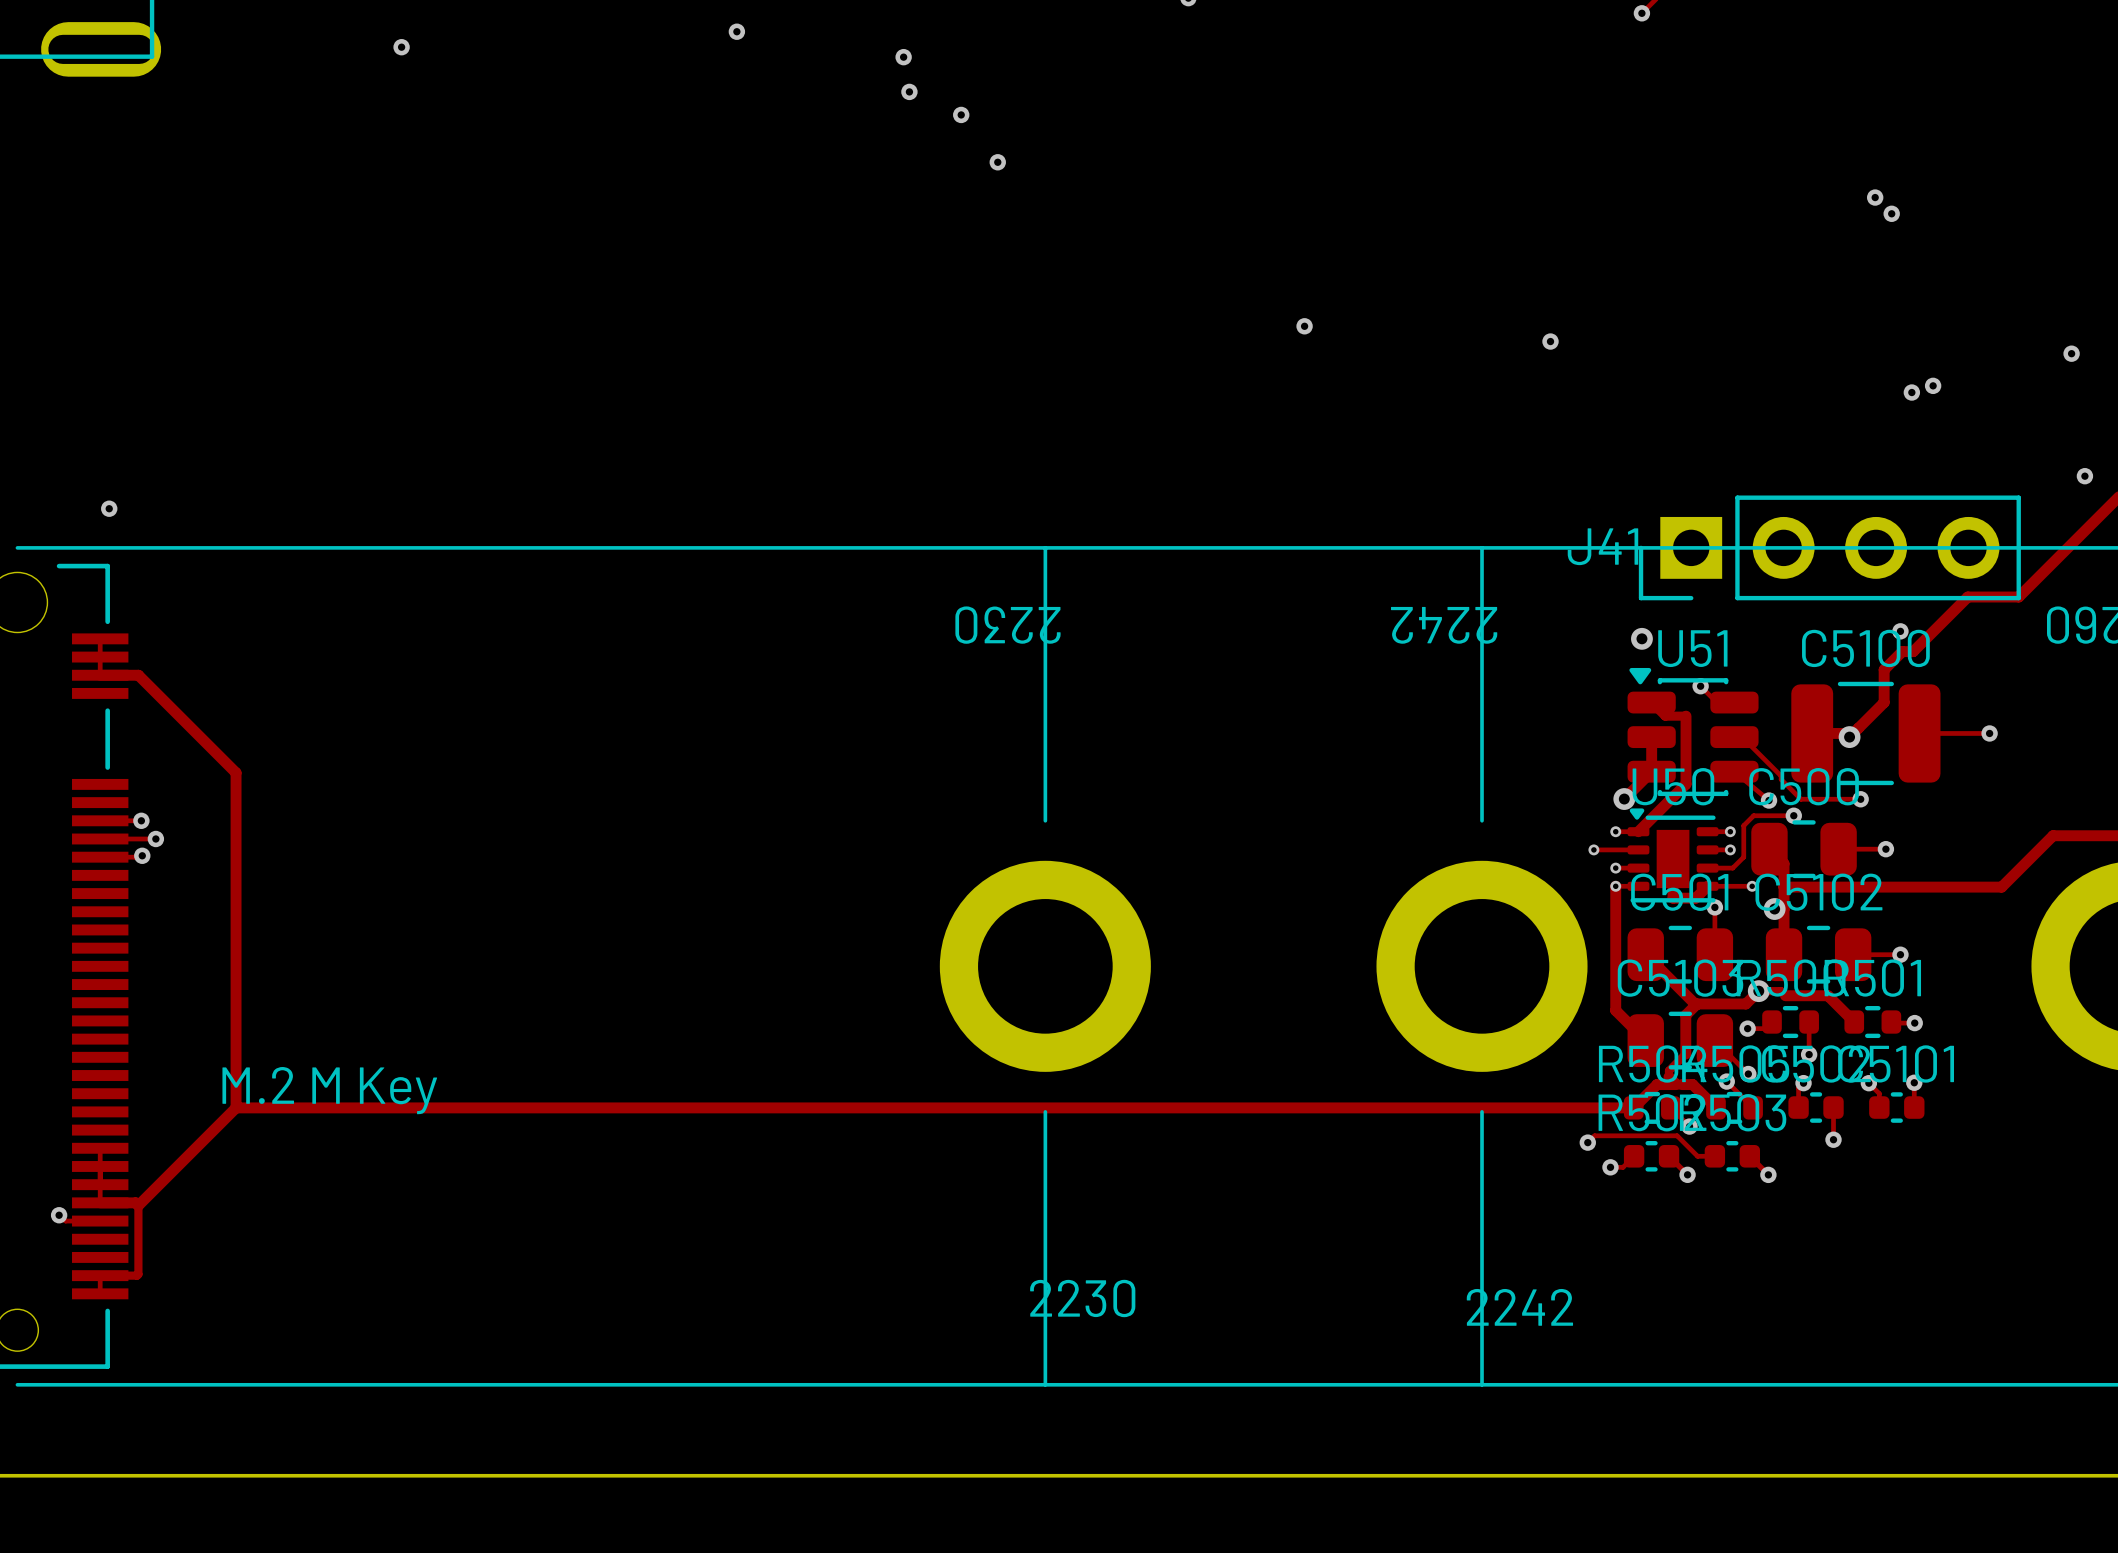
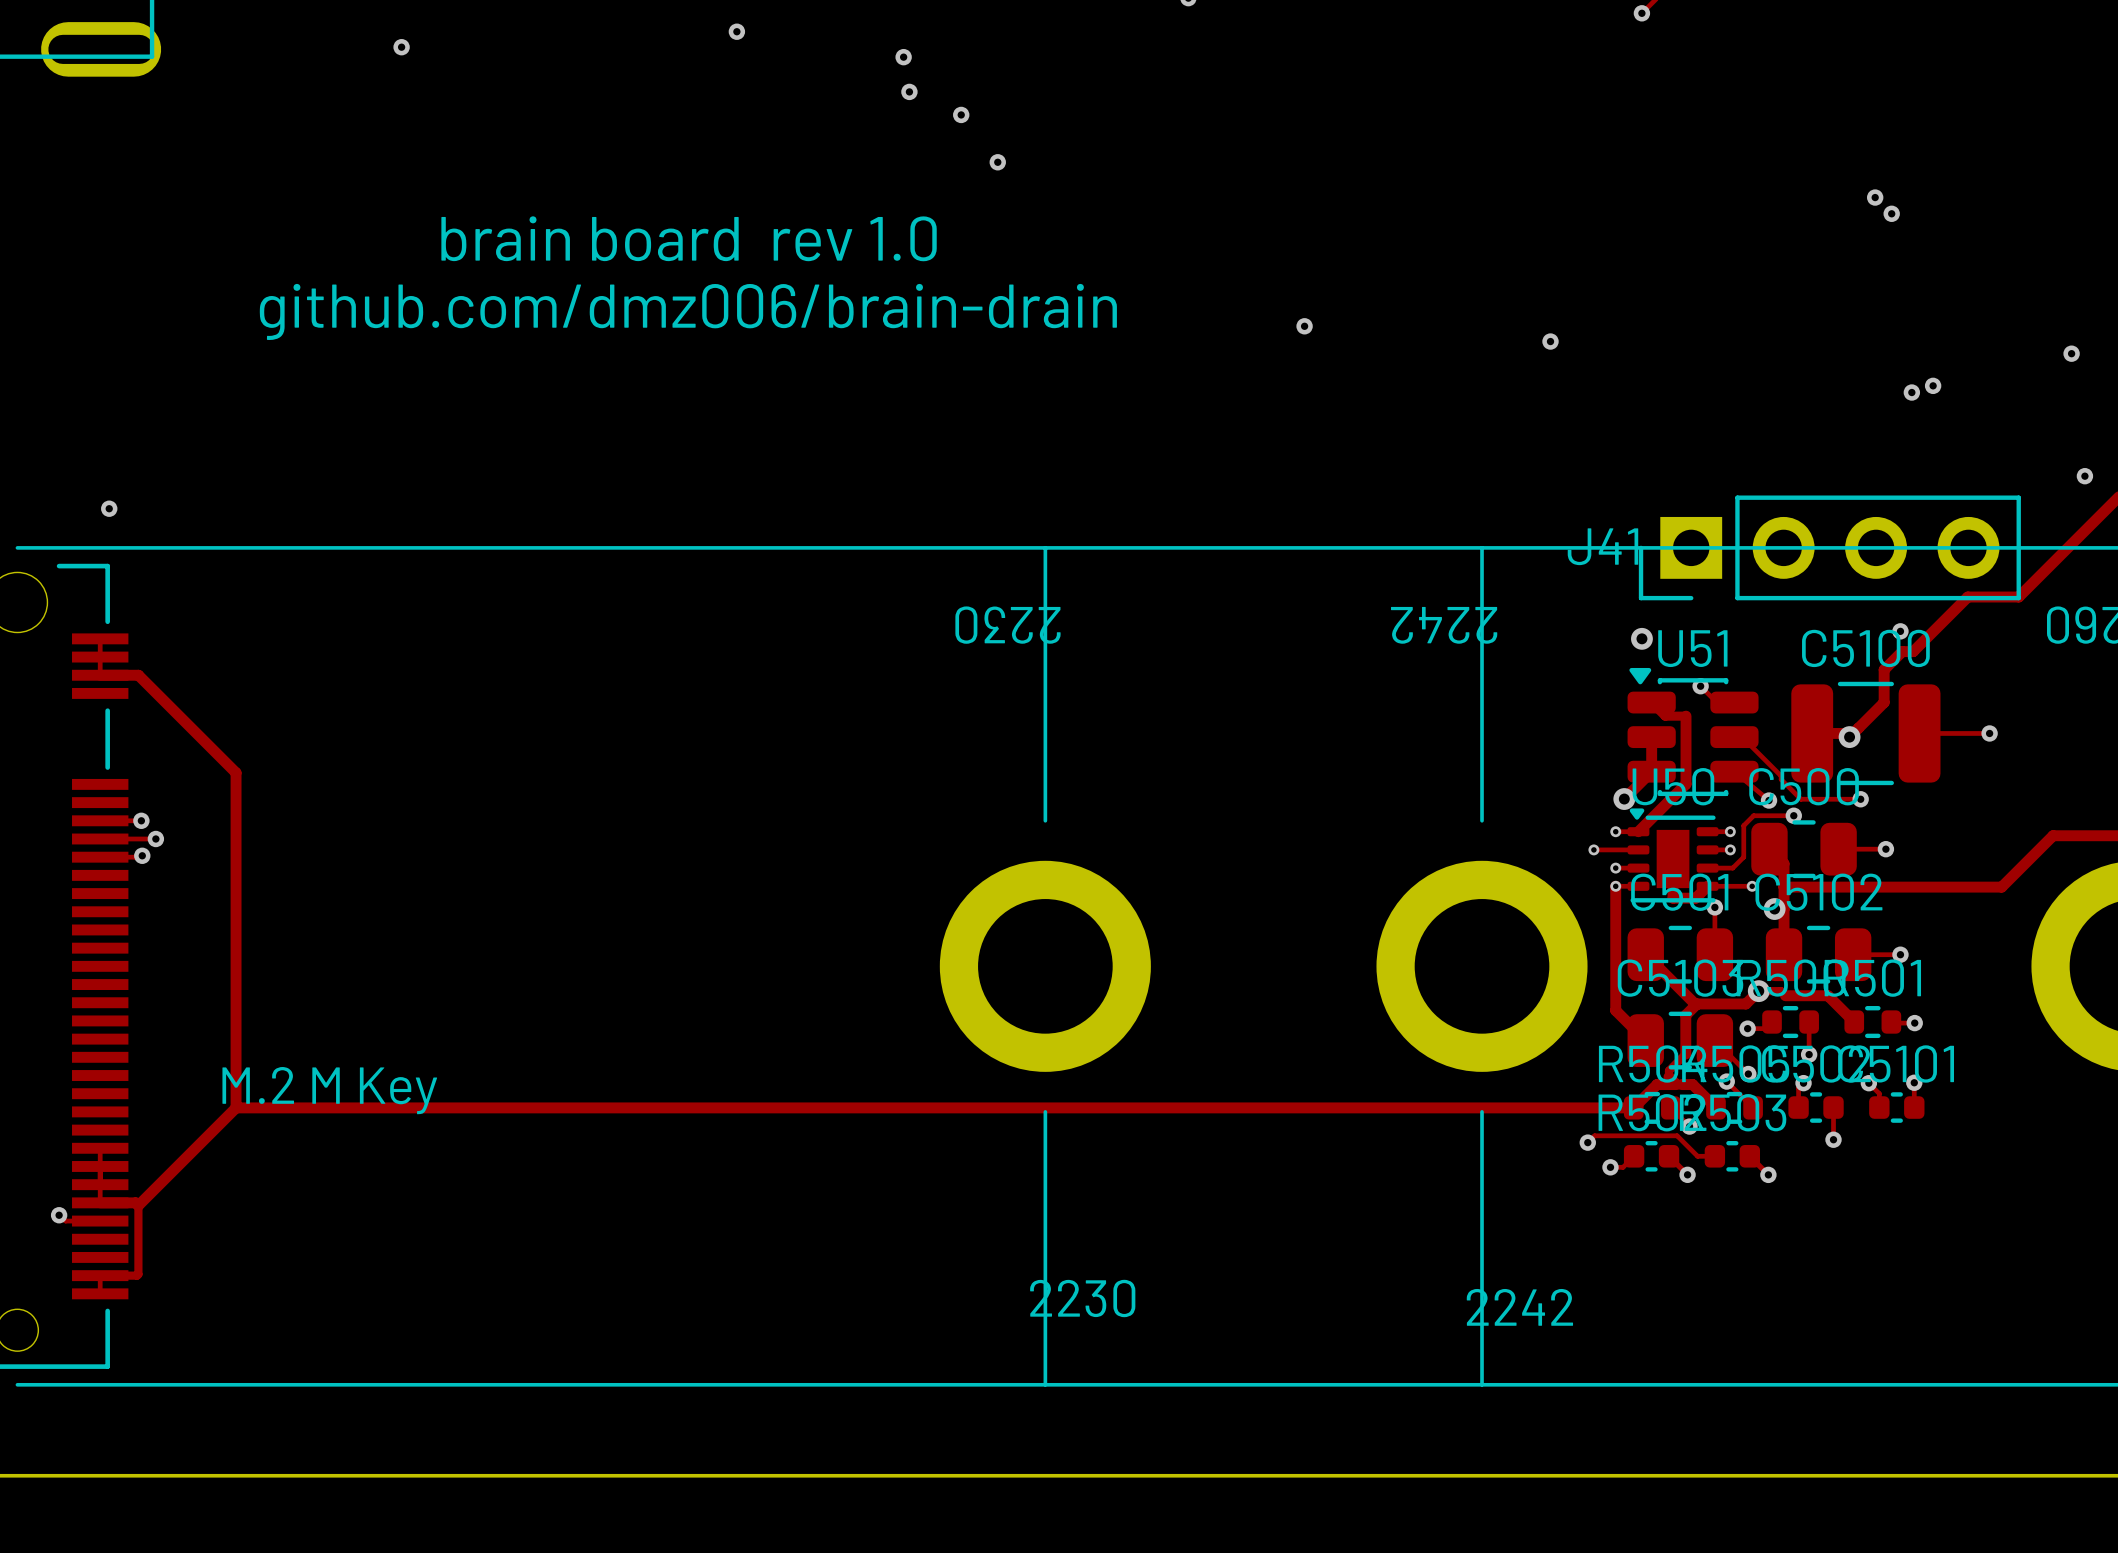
text: none -> brain board rev 1.0 (689, 238)
text: none -> github.com/dmz006/brain-drain (688, 311)

